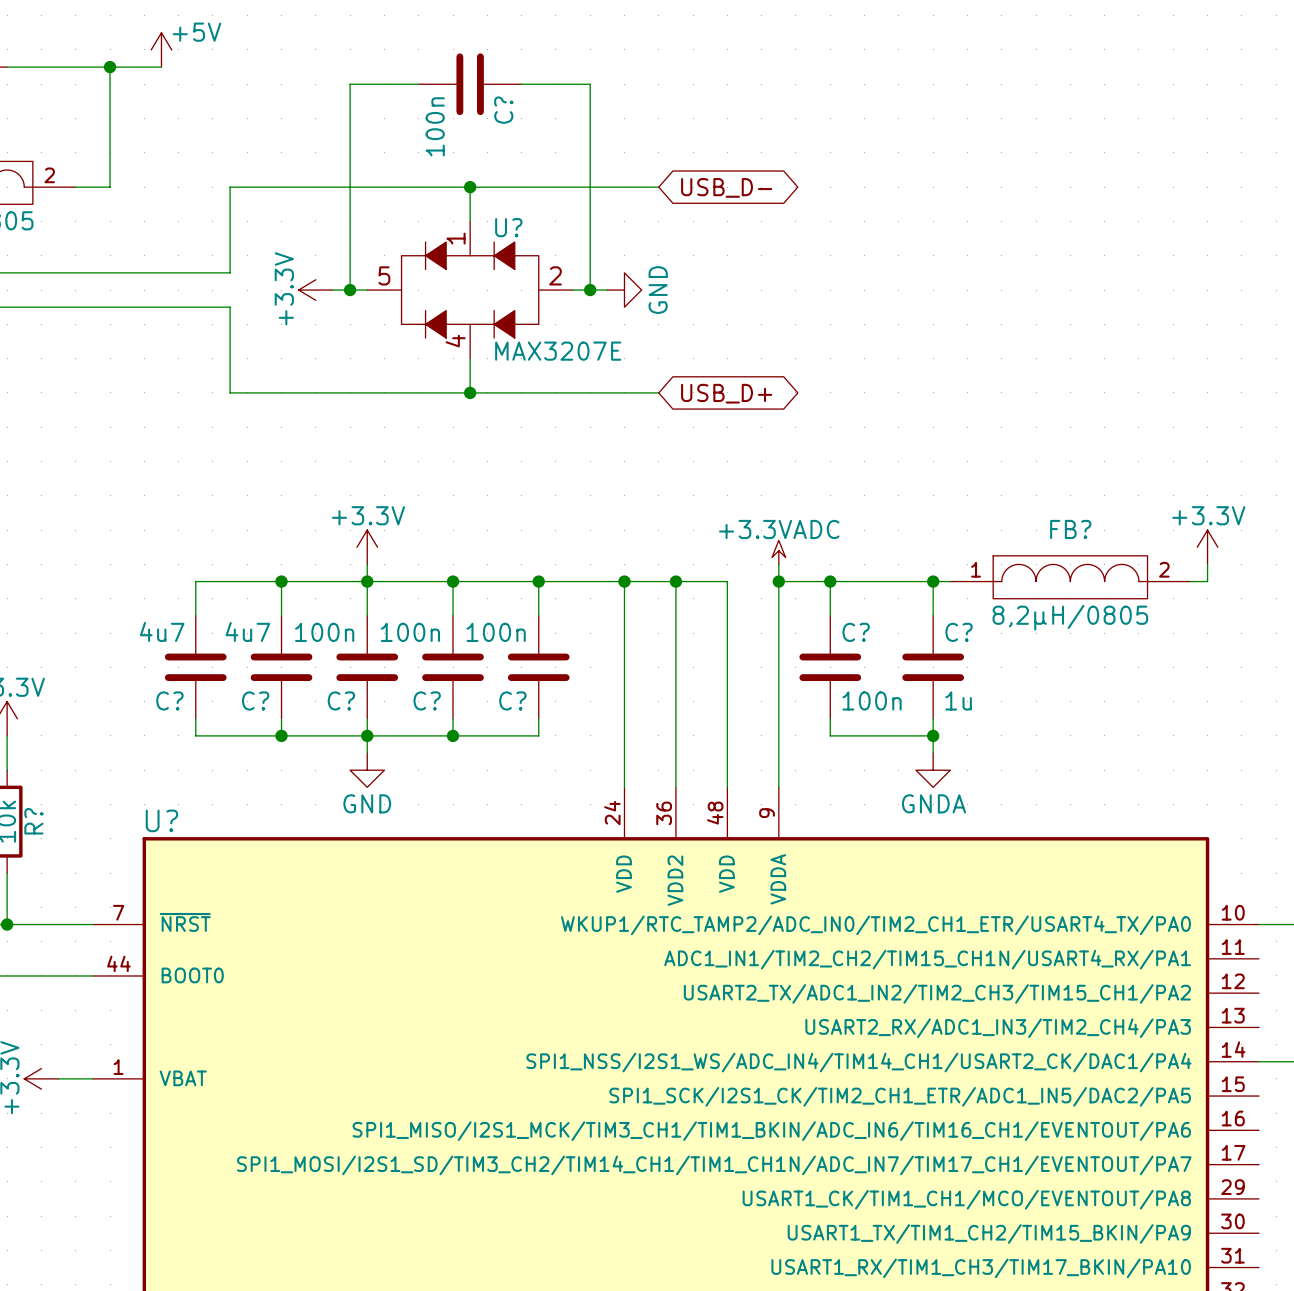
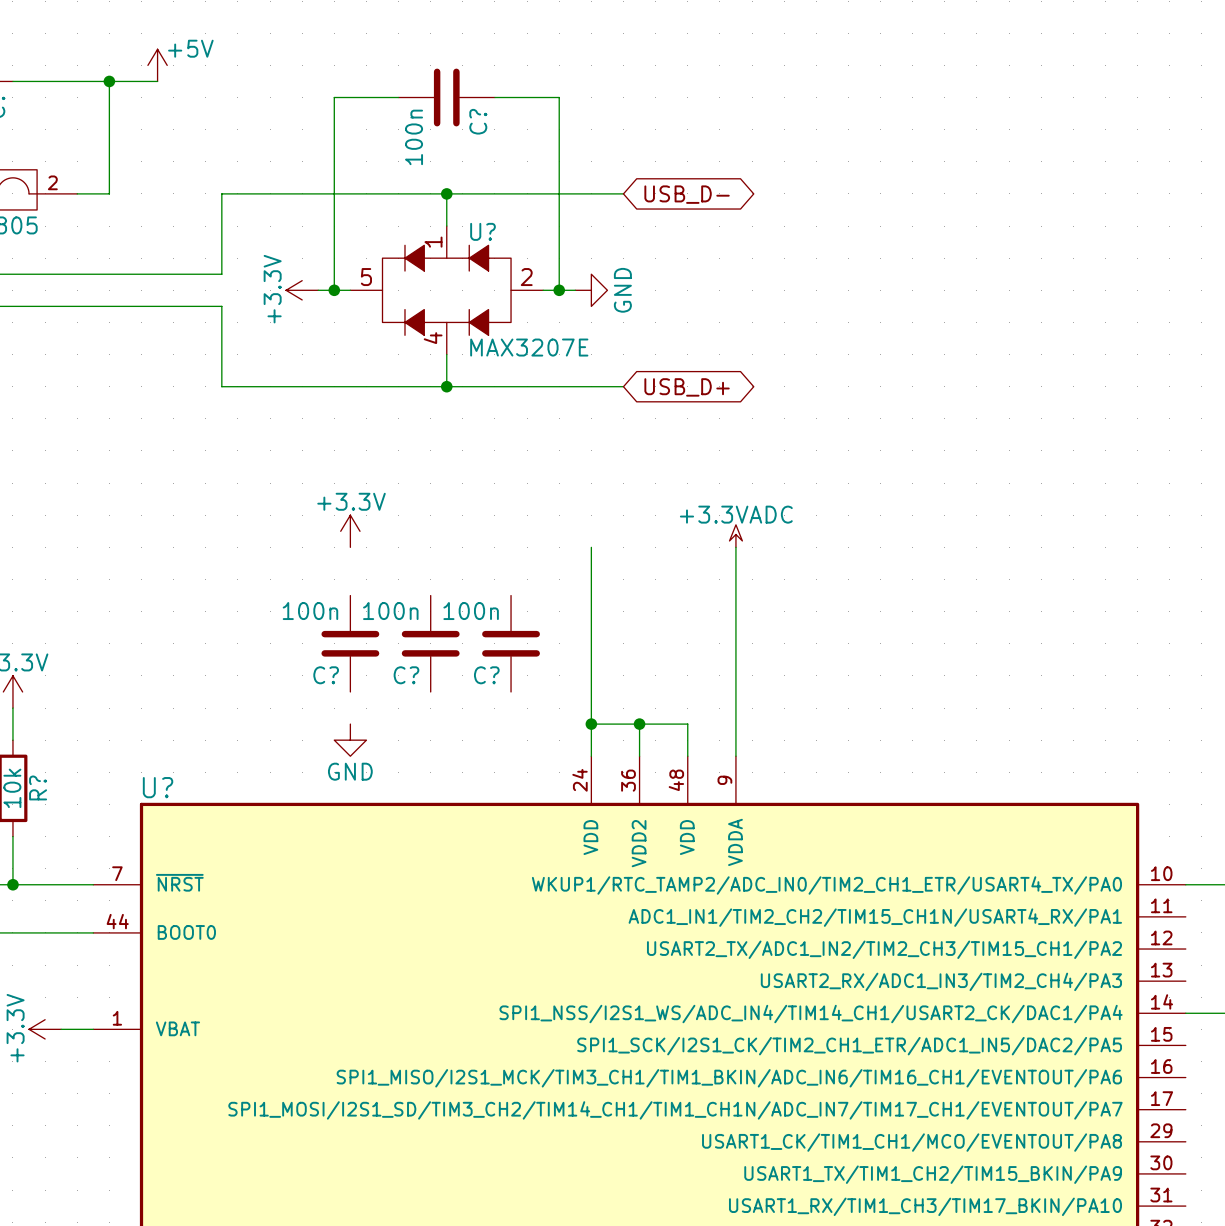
power symbol: +3.3V (1207, 547) -> none
wire: (367, 564) (367, 615) -> none
wire: (1207, 564) (1207, 581) (1190, 581) -> none
FB?: 8,2µH/0805 (1070, 577) -> none
wire: (281, 581) (281, 615) -> none
junction: (281, 581) -> none
junction: (367, 581) -> none
wire: (453, 581) (453, 615) -> none
junction: (453, 581) -> none
wire: (538, 581) (538, 615) -> none
junction: (538, 581) -> none
junction: (624, 581) -> none
wire: (675, 581) (675, 753) -> none
junction: (675, 581) -> none
wire: (778, 581) (950, 581) -> none
junction: (778, 581) -> none
wire: (830, 581) (830, 615) -> none
junction: (830, 581) -> none
wire: (933, 581) (933, 615) -> none
junction: (933, 581) -> none
wire: (195, 615) (195, 581) (727, 581) (727, 753) -> (591, 724) (687, 724)
C?: 4u7 (195, 667) -> none
C?: 4u7 (281, 667) -> none
C?: 100n (830, 667) -> none
C?: 1u (933, 667) -> none
wire: (195, 718) (195, 735) (538, 735) (538, 718) -> none
wire: (281, 718) (281, 735) -> none
wire: (367, 718) (367, 753) -> none
wire: (453, 718) (453, 735) -> (591, 547) (591, 563)
wire: (830, 718) (830, 735) (933, 735) -> none
wire: (933, 718) (933, 753) -> none
junction: (281, 735) -> none
junction: (367, 735) -> none
junction: (453, 735) -> none
junction: (933, 735) -> none
junction: none -> (591, 724)
junction: none -> (639, 724)
power symbol: GNDA (933, 770) -> none

